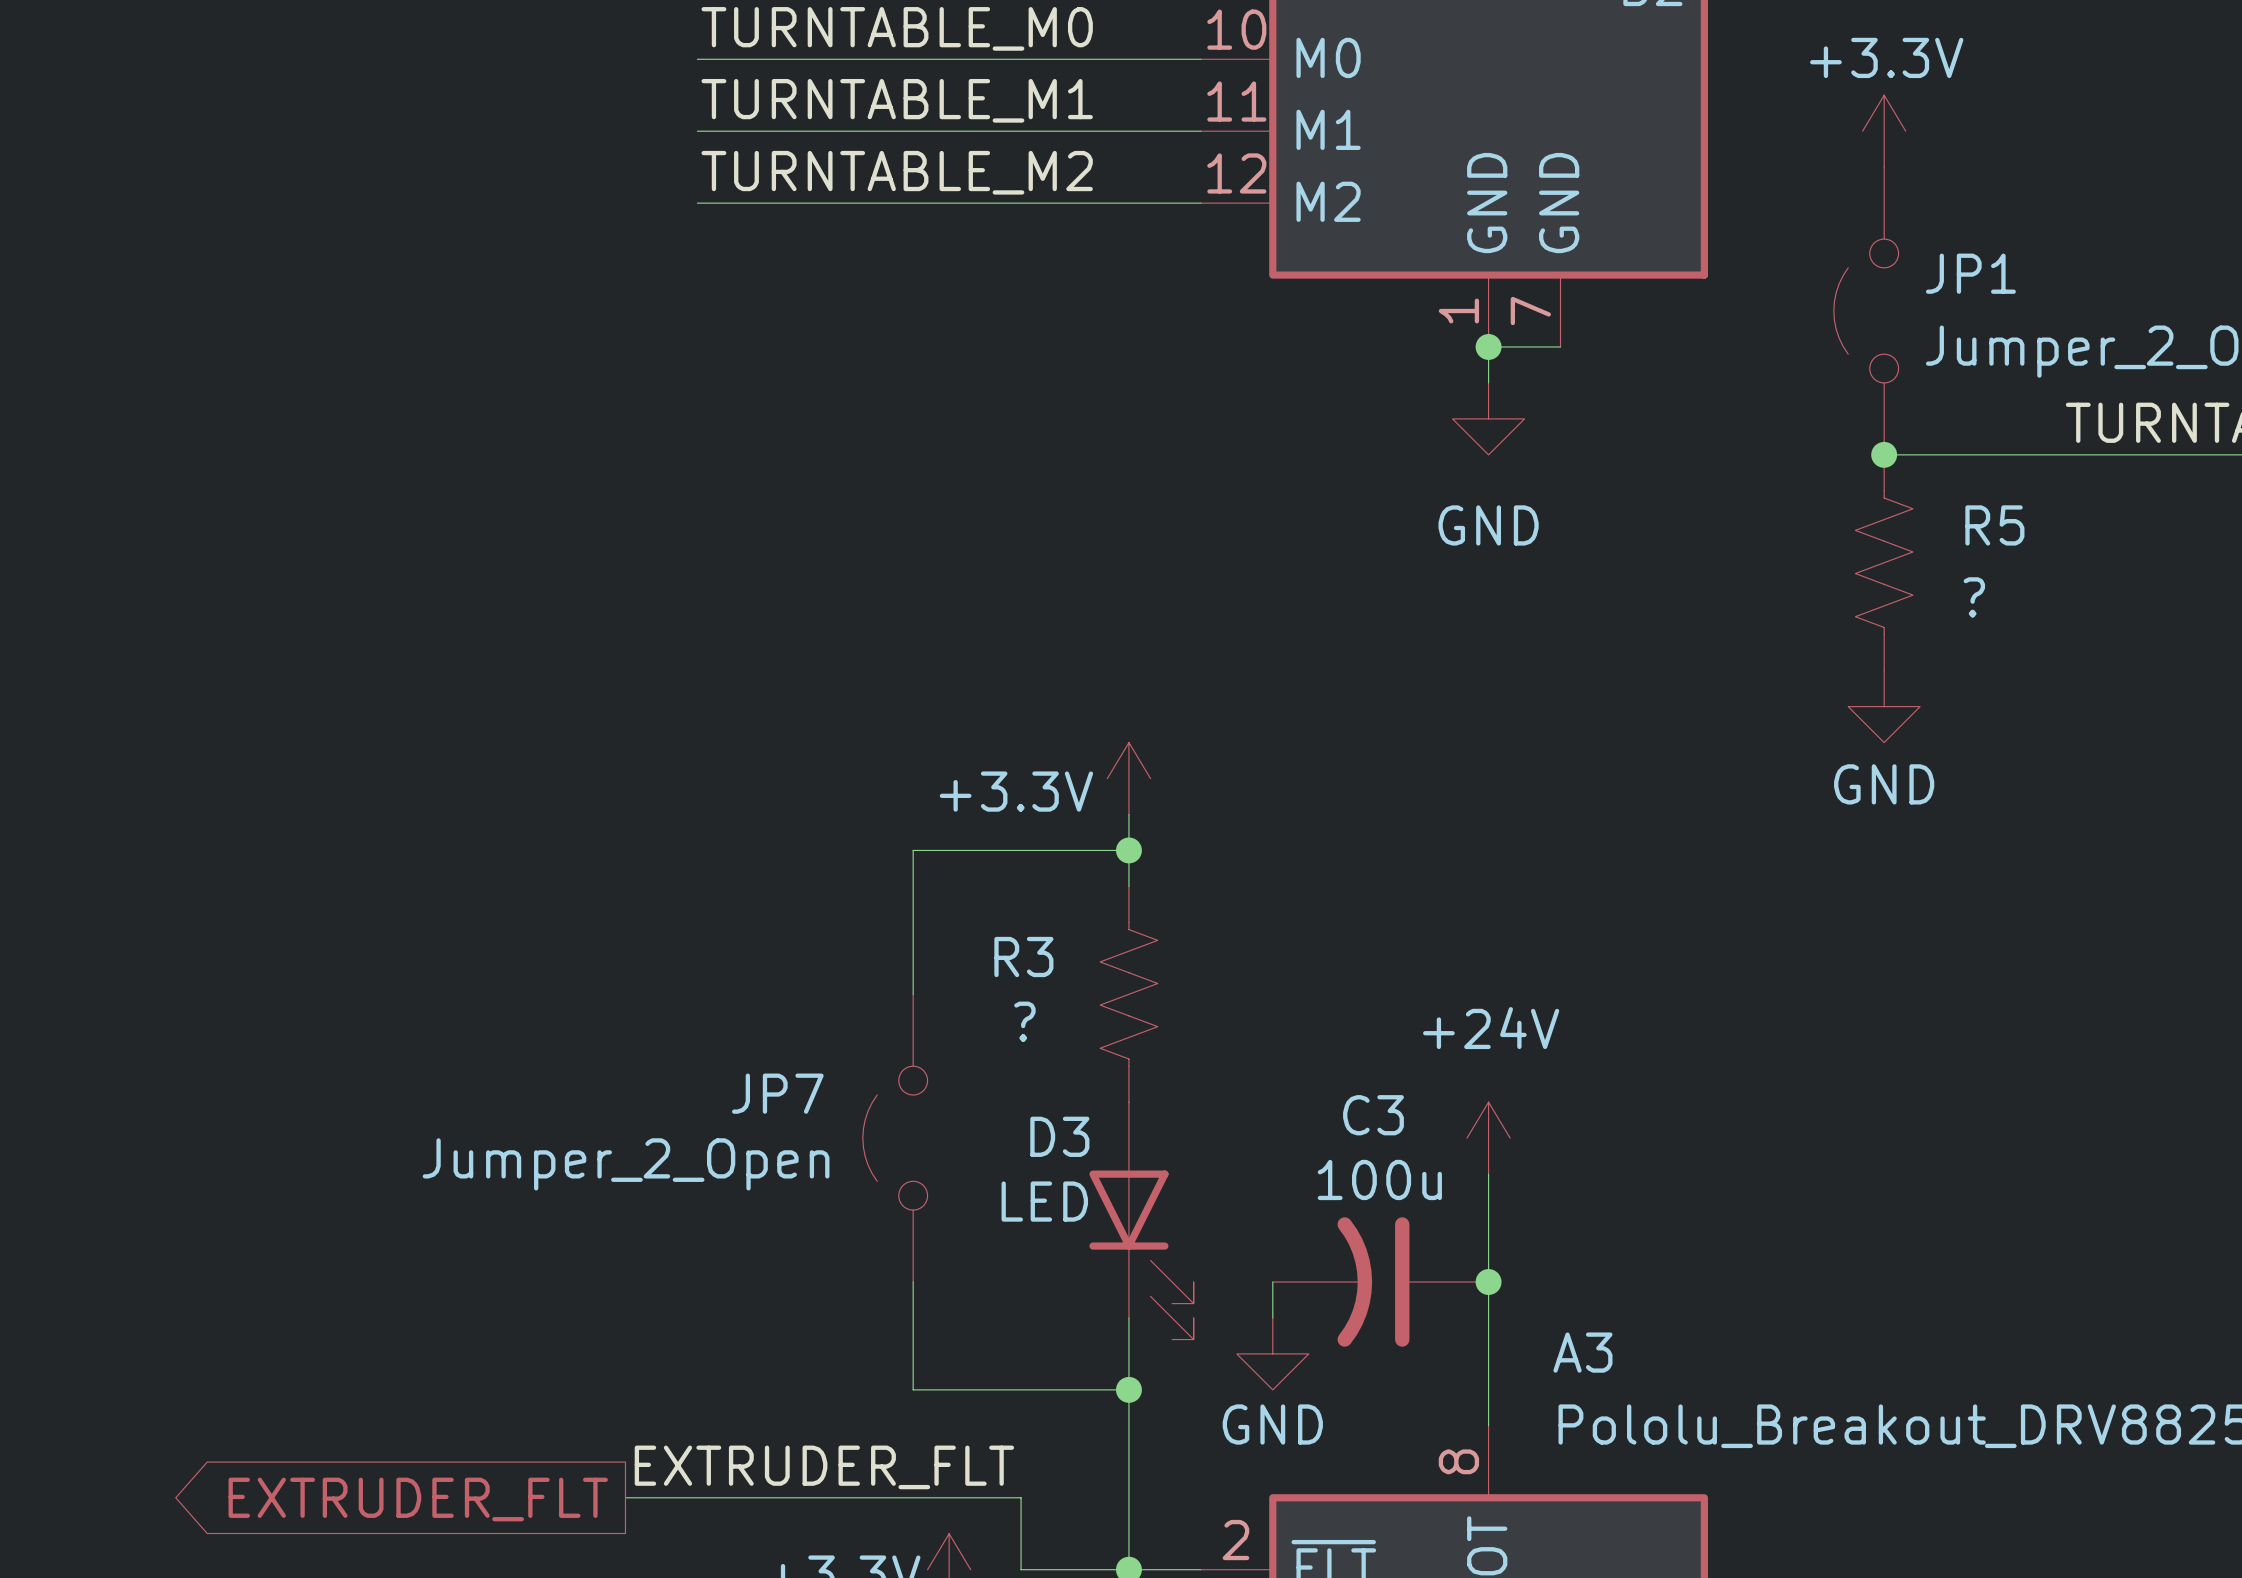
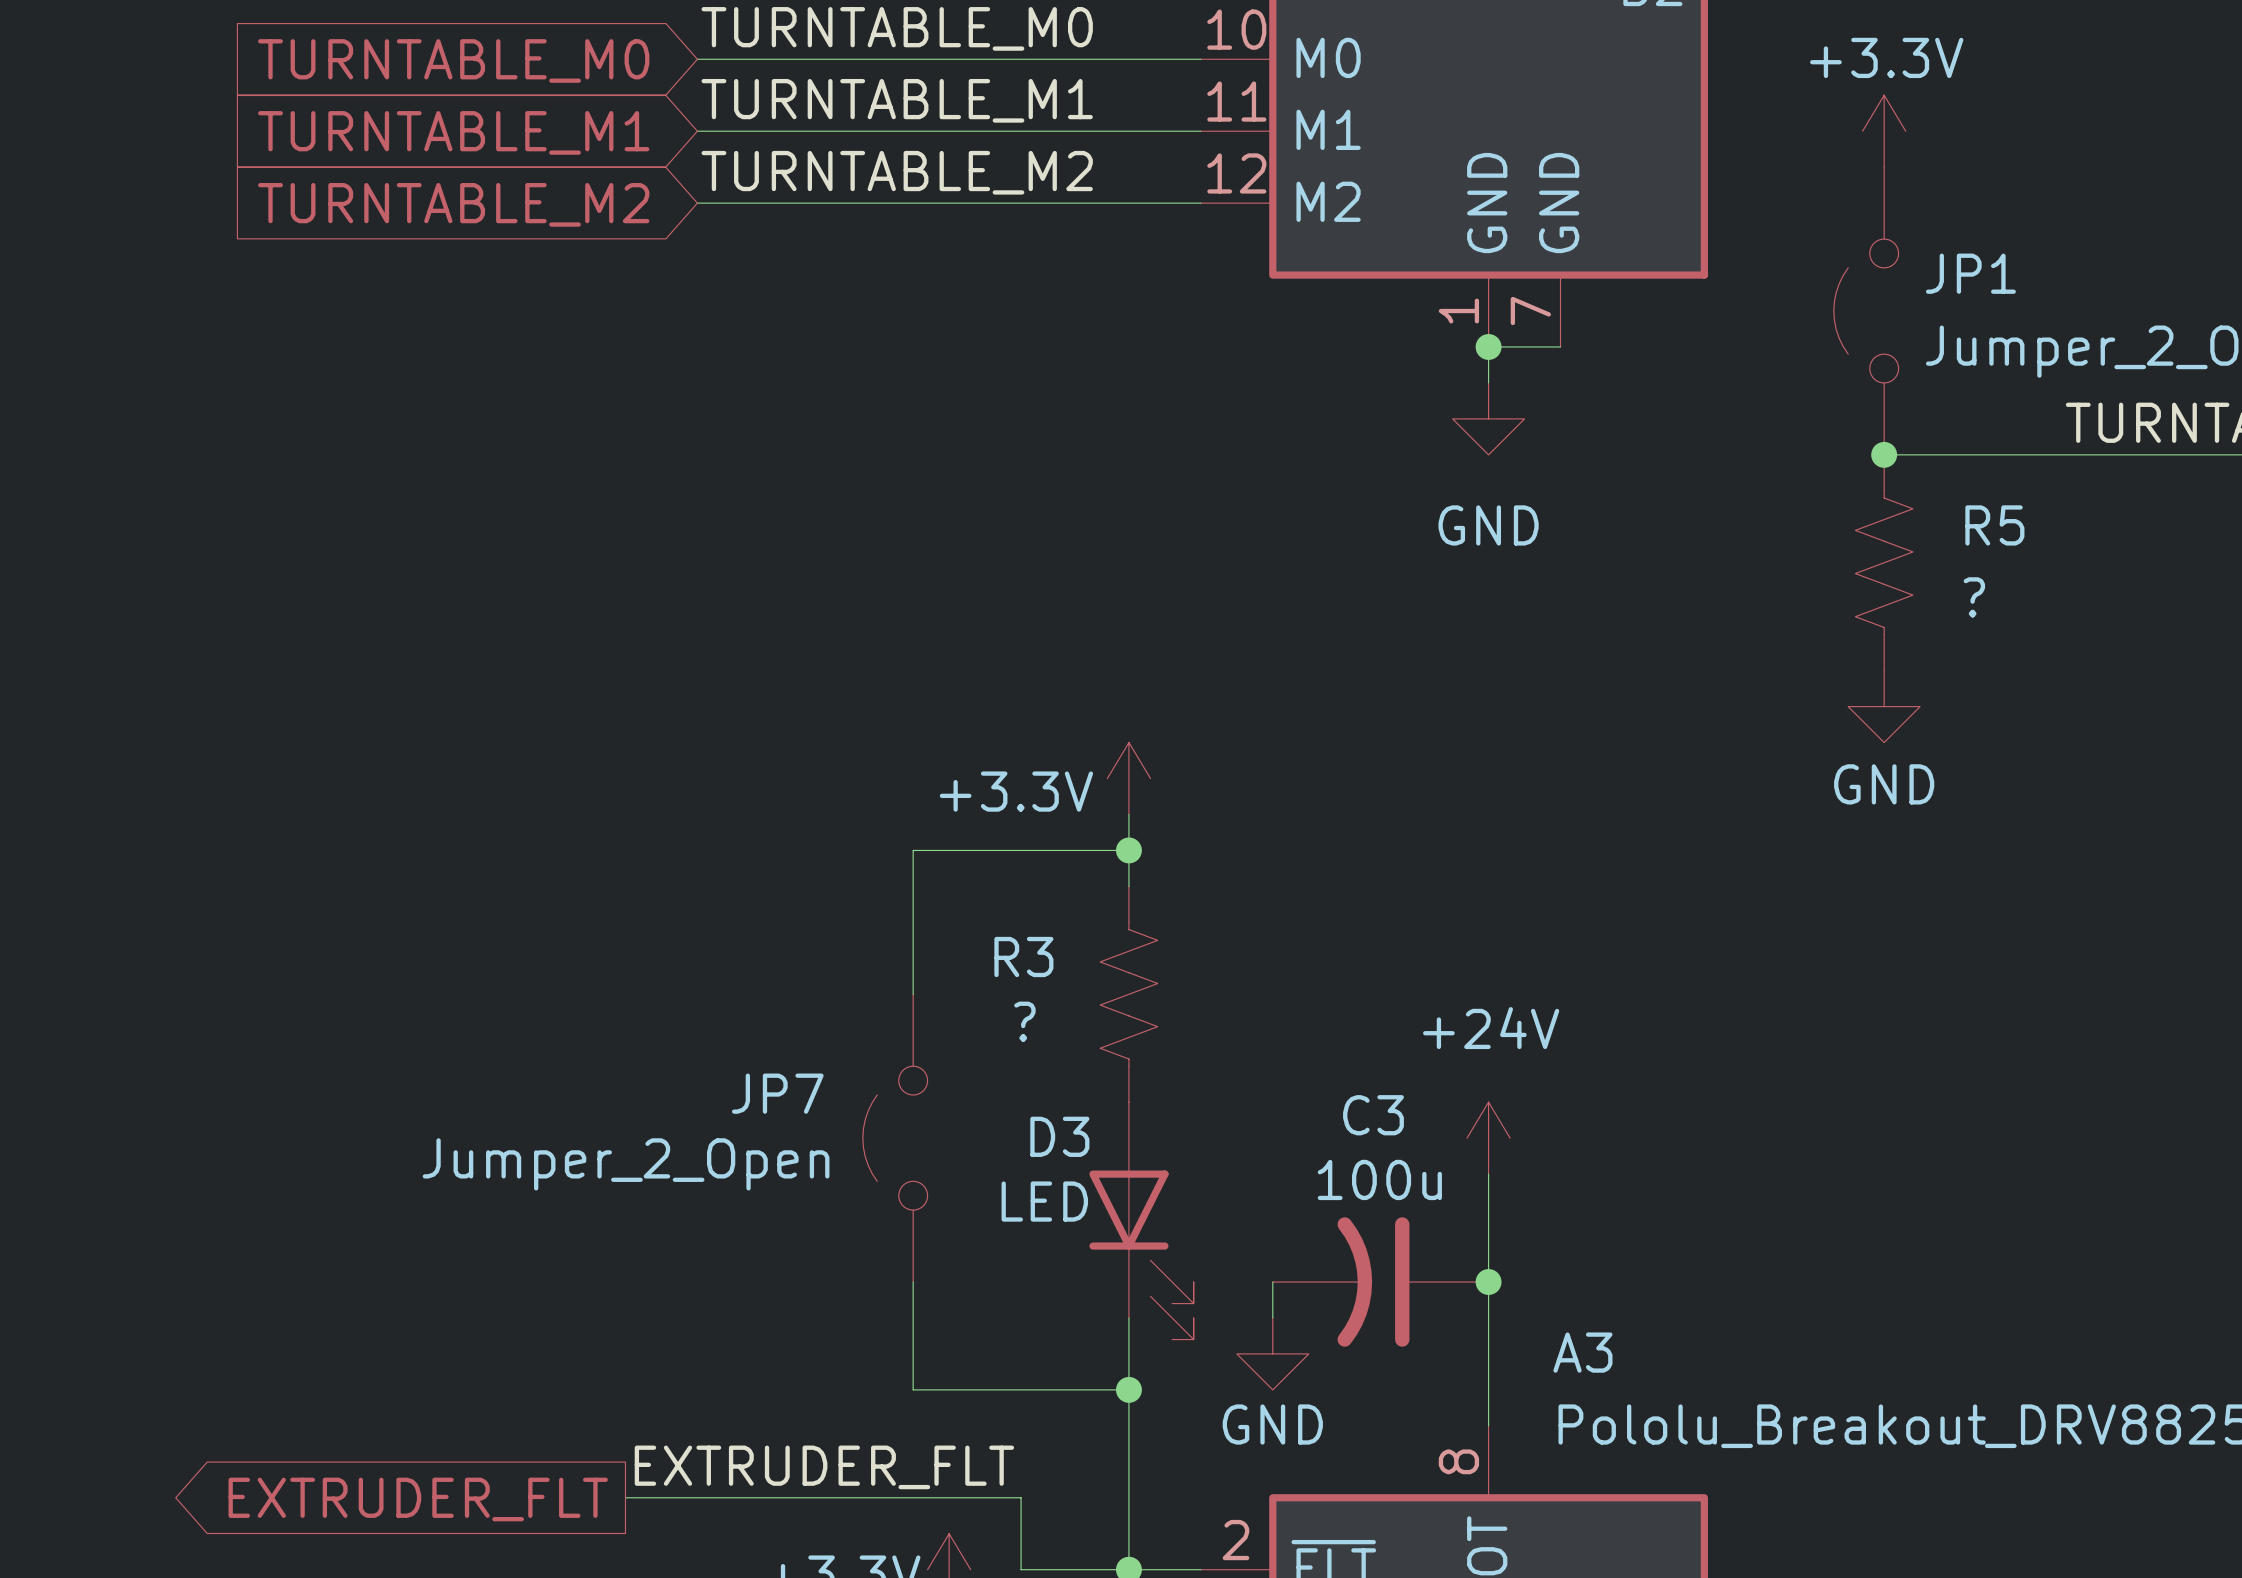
global label: none -> TURNTABLE_M0 (453, 60)
global label: none -> TURNTABLE_M1 (453, 132)
global label: none -> TURNTABLE_M2 (453, 204)

